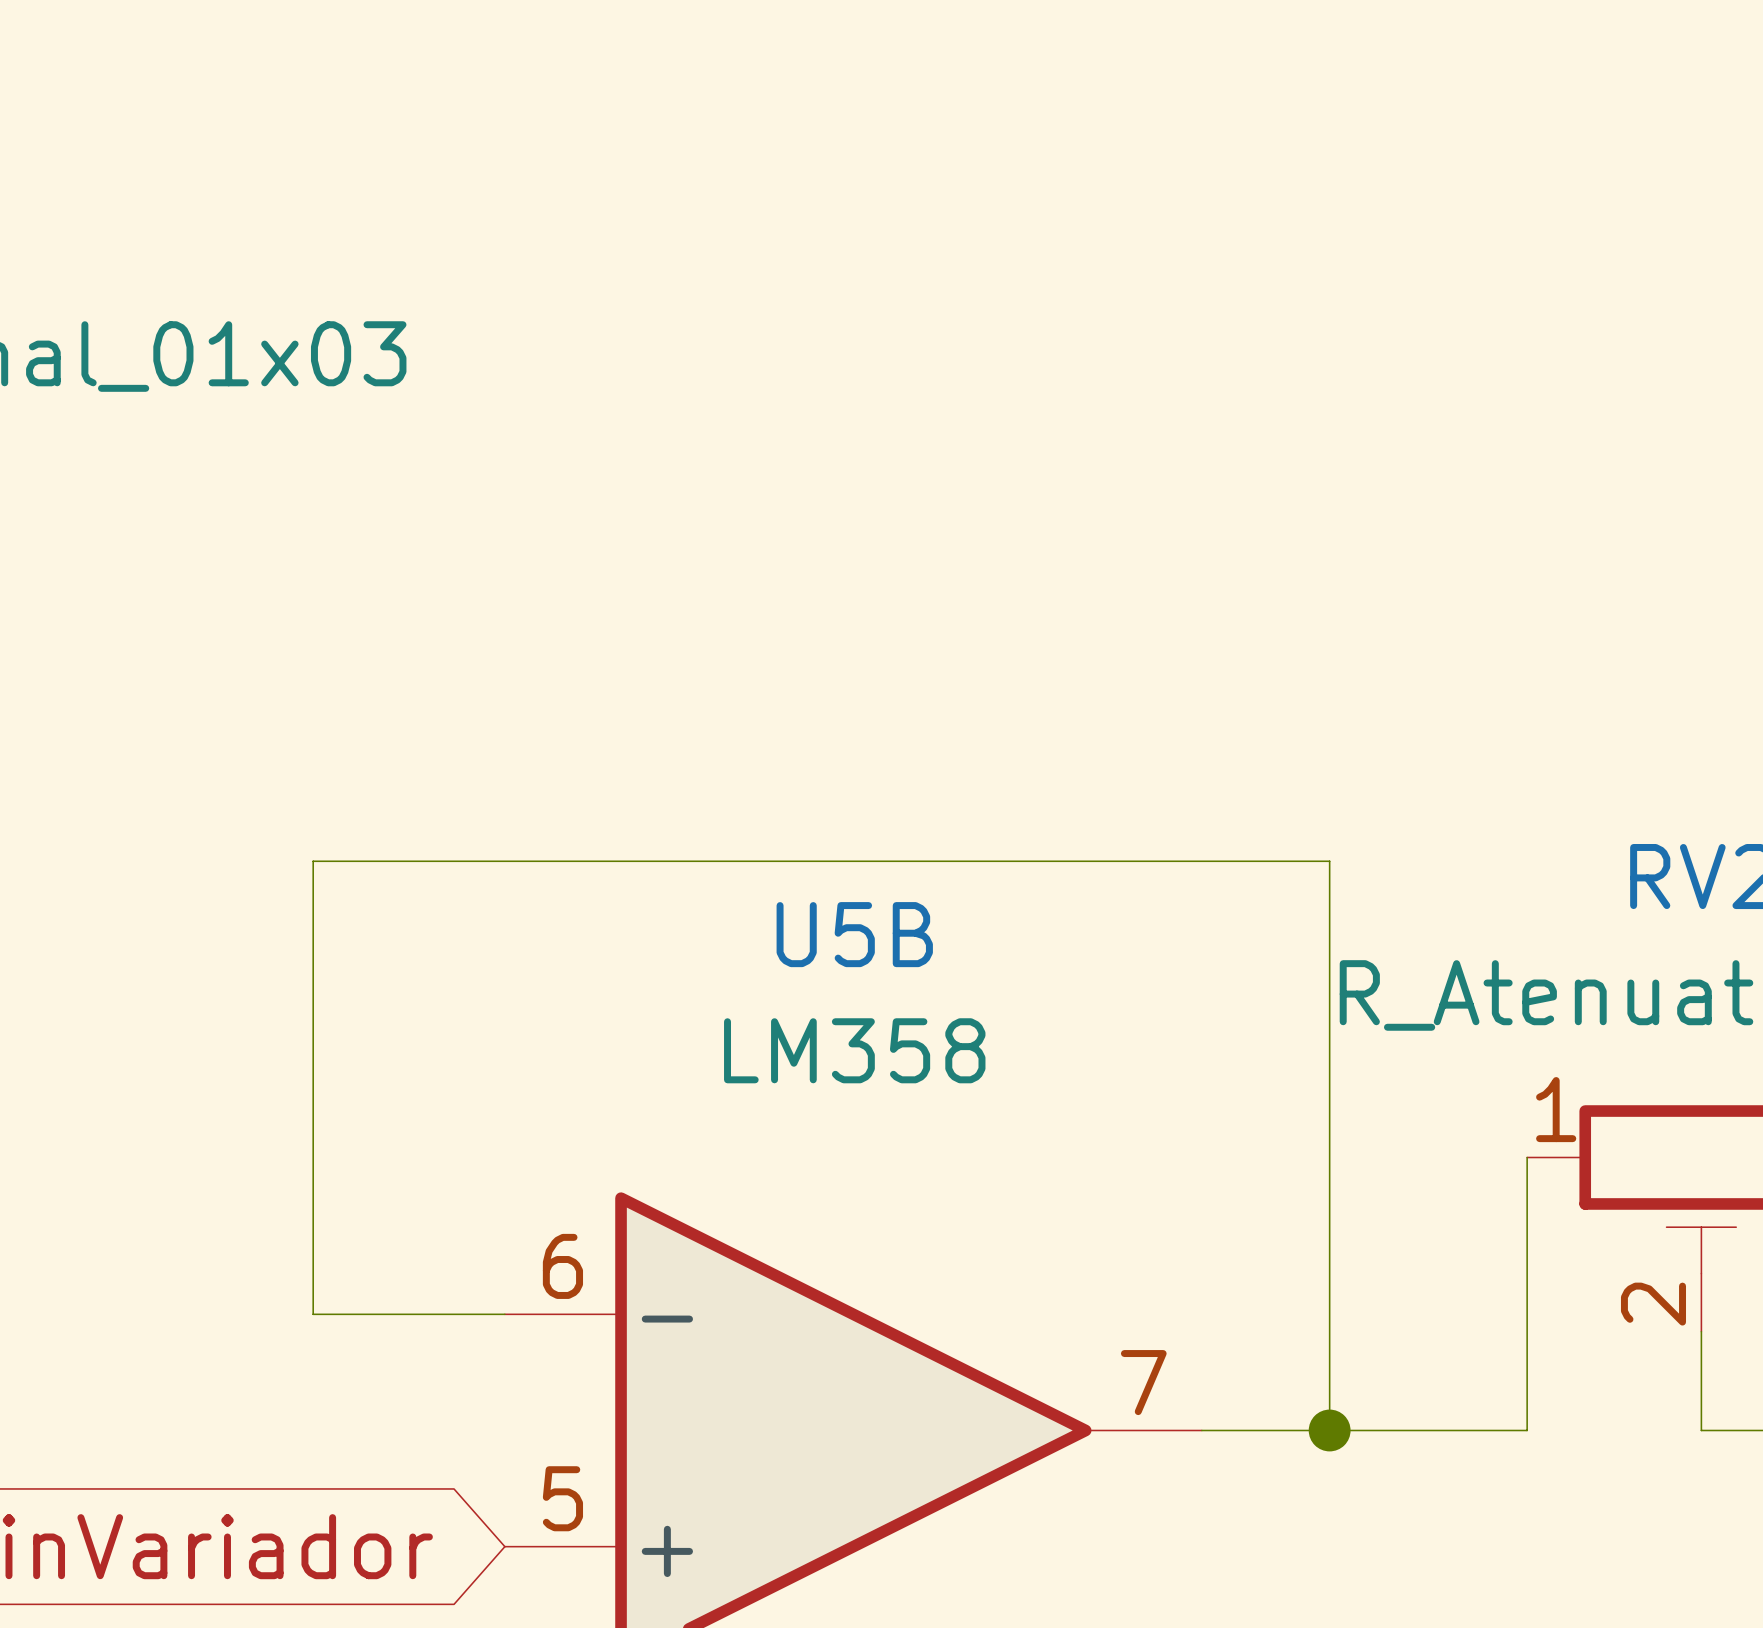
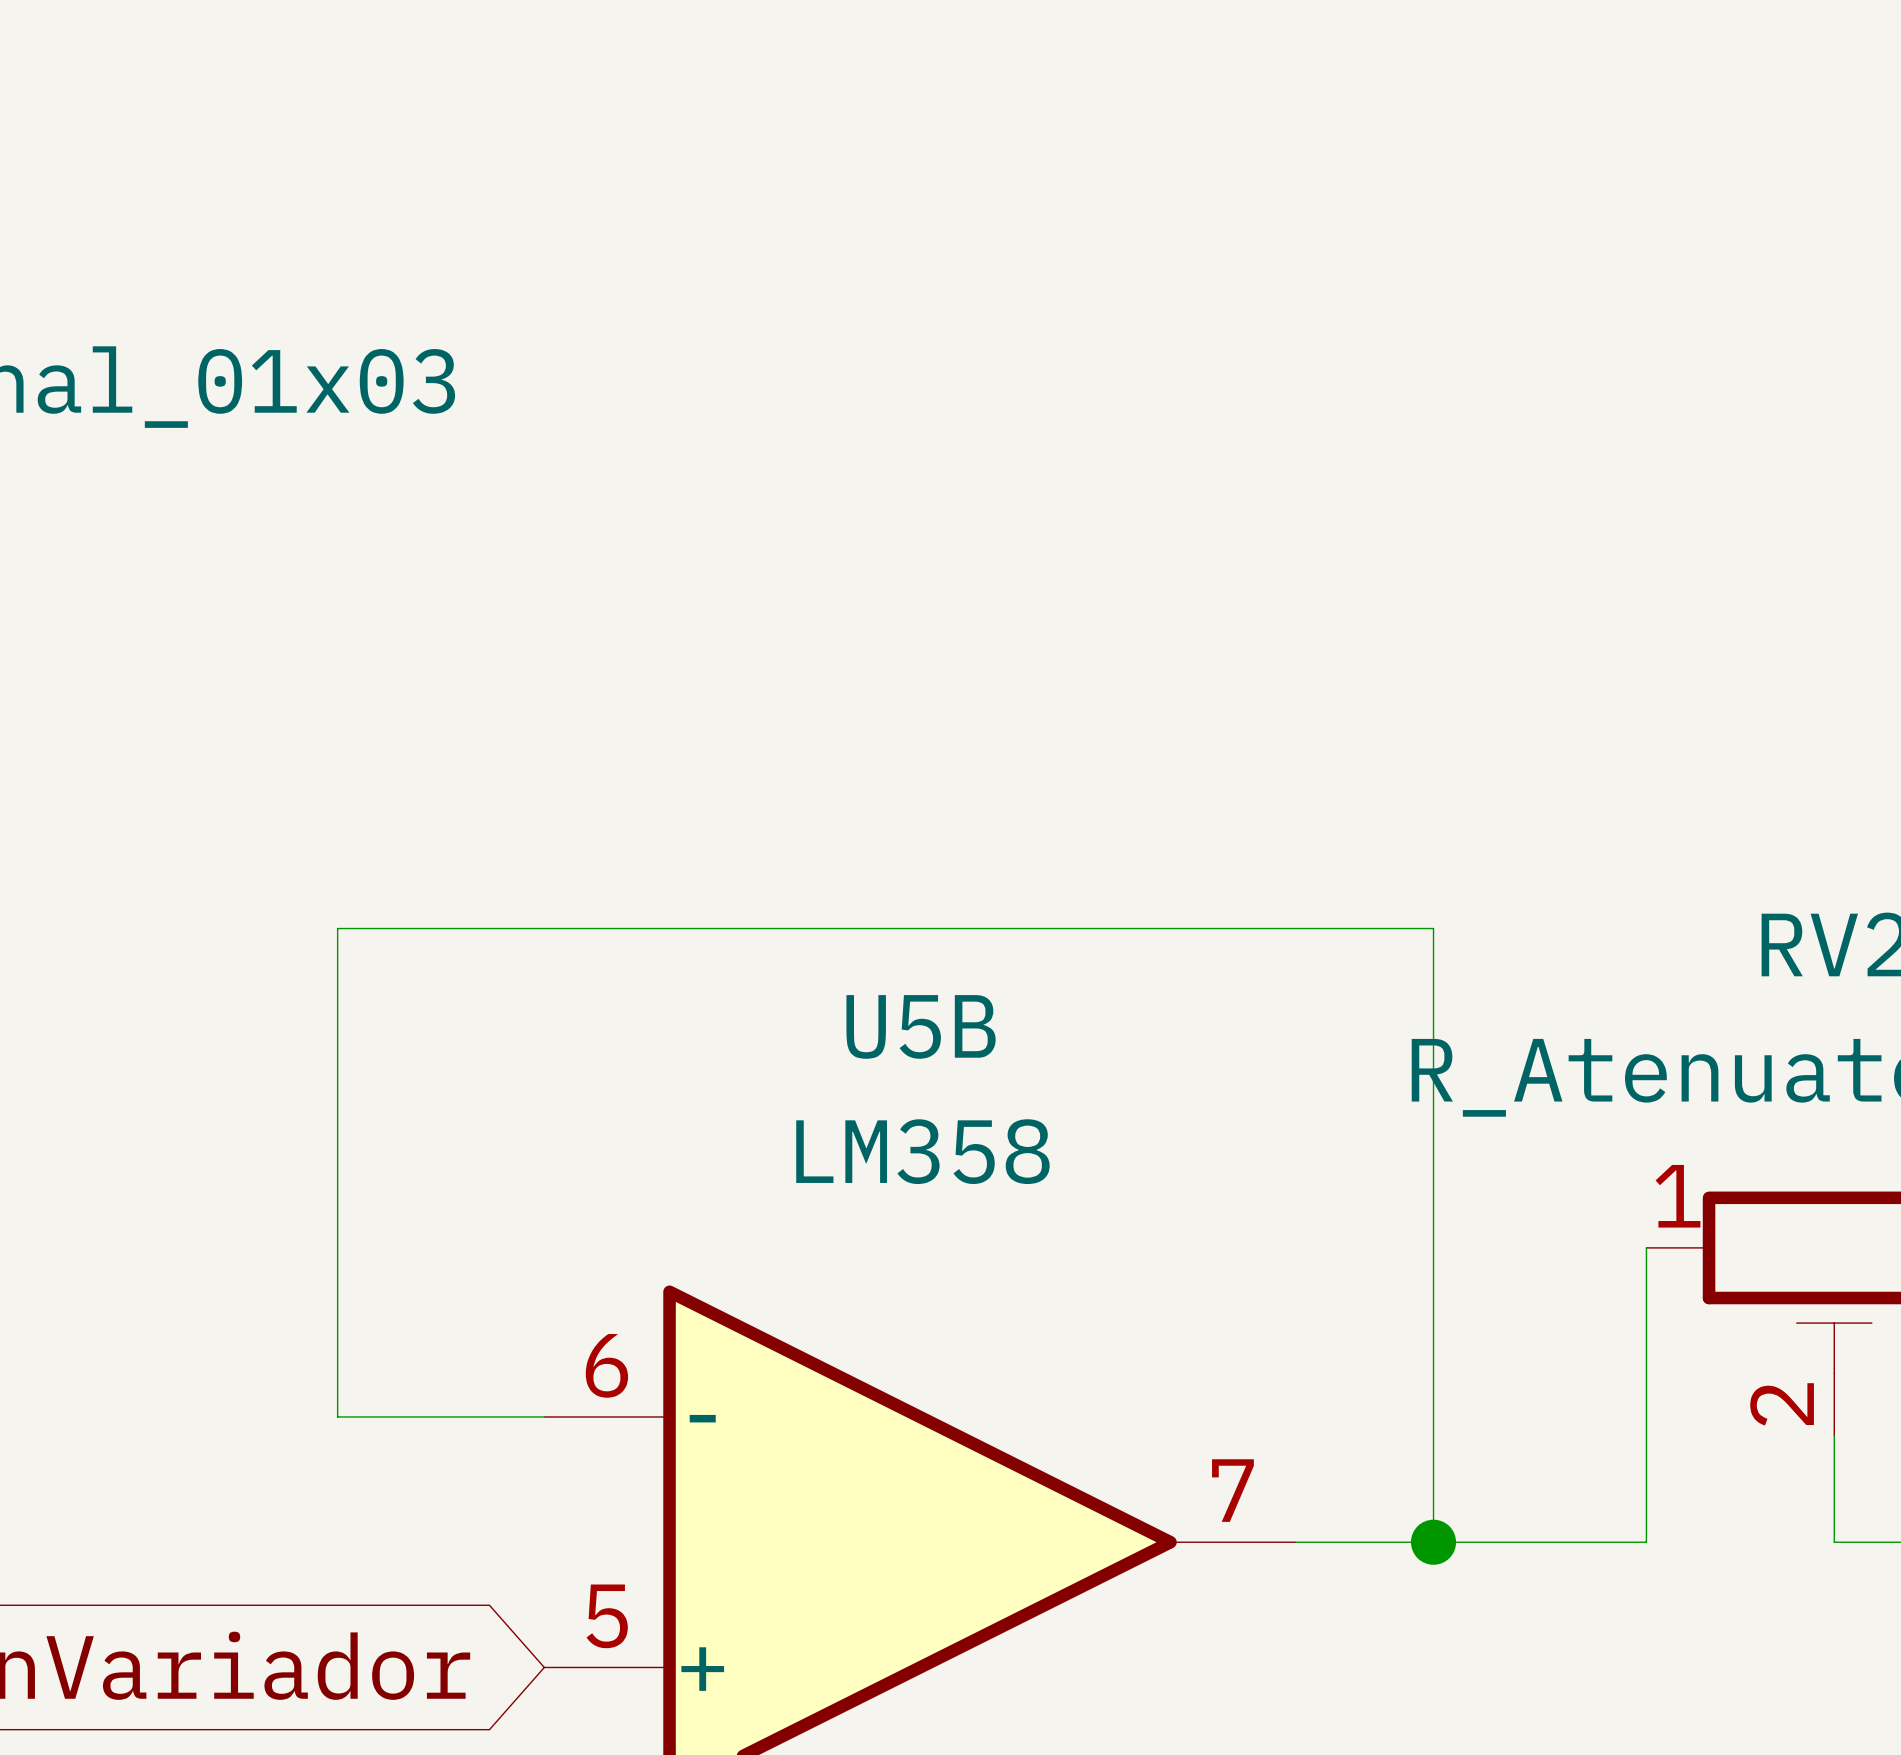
U5B name position: U5B (854, 934) -> U5B (921, 1026)
U5B value position: LM358 (854, 1050) -> LM358 (922, 1151)

